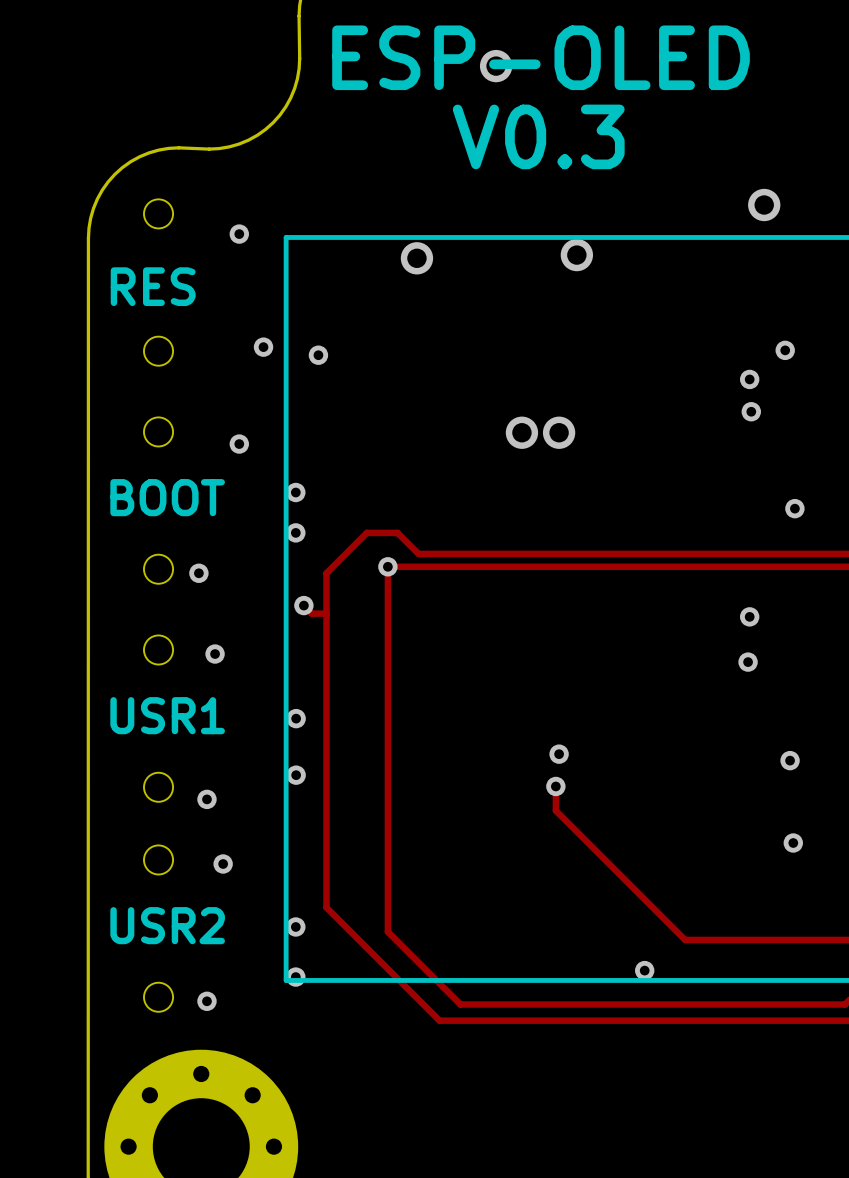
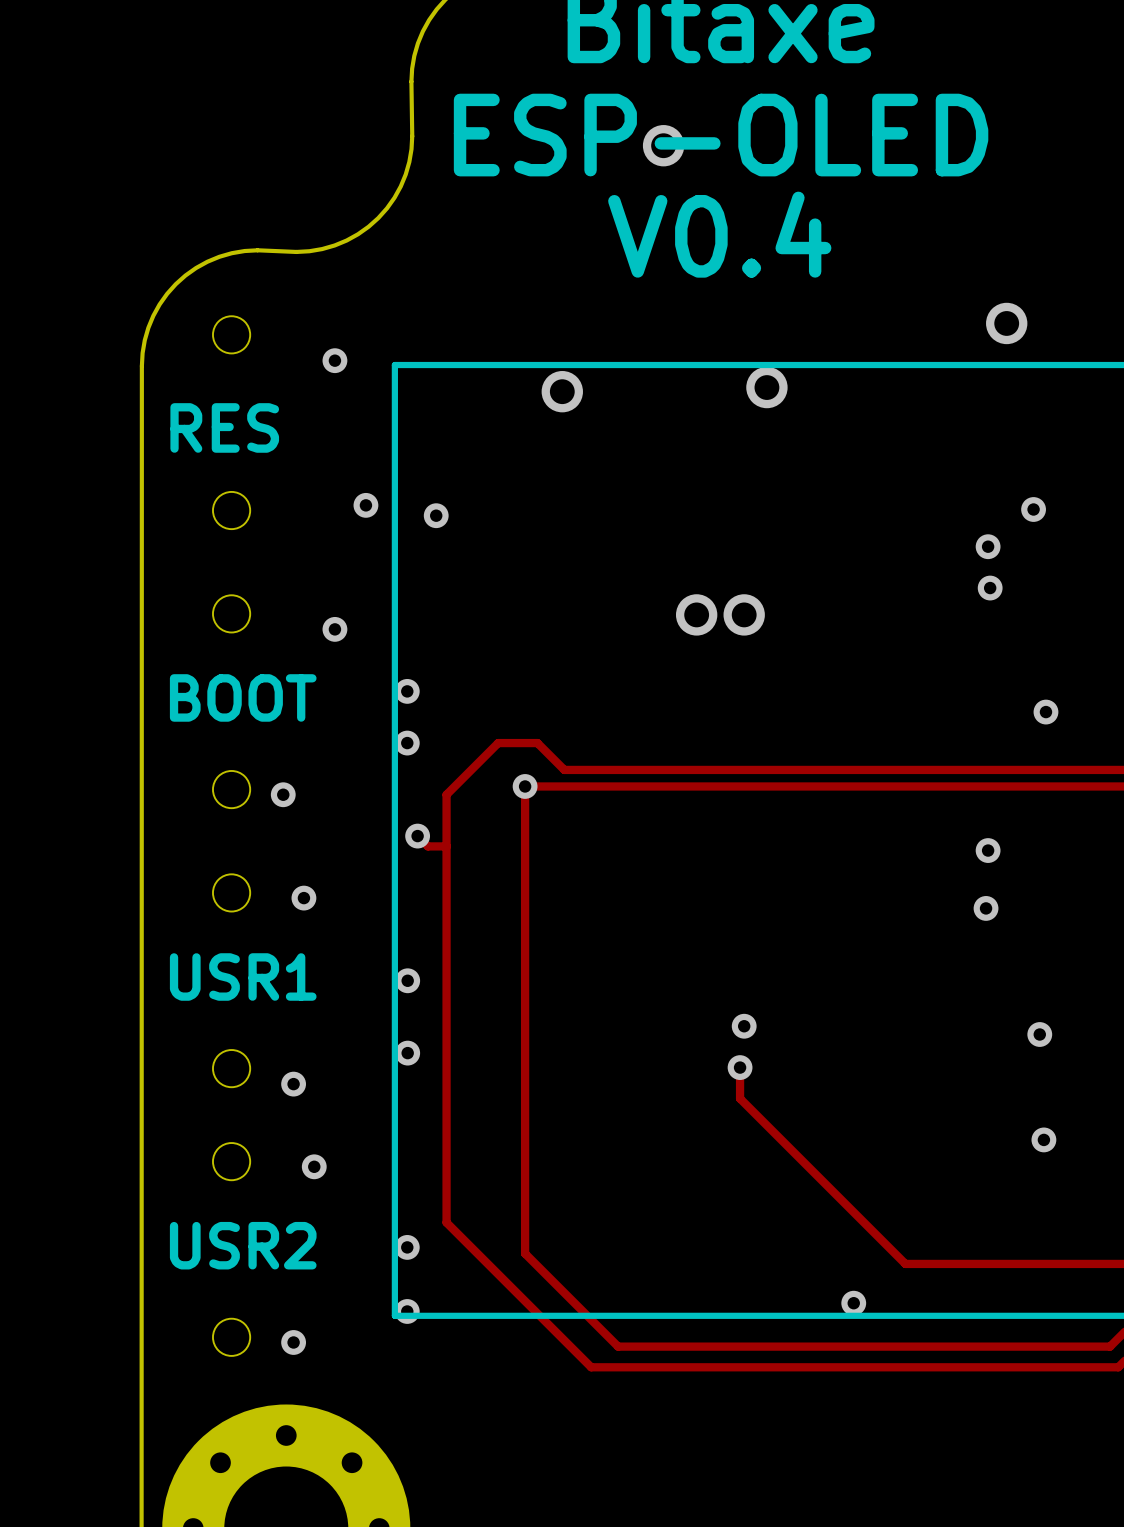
text: V0.3 (538, 136) -> V0.4 (719, 234)

